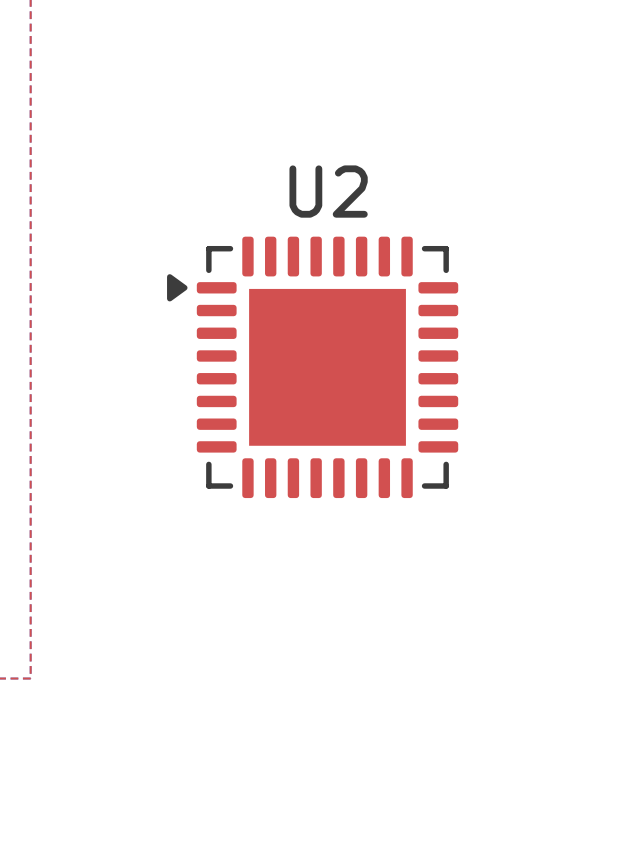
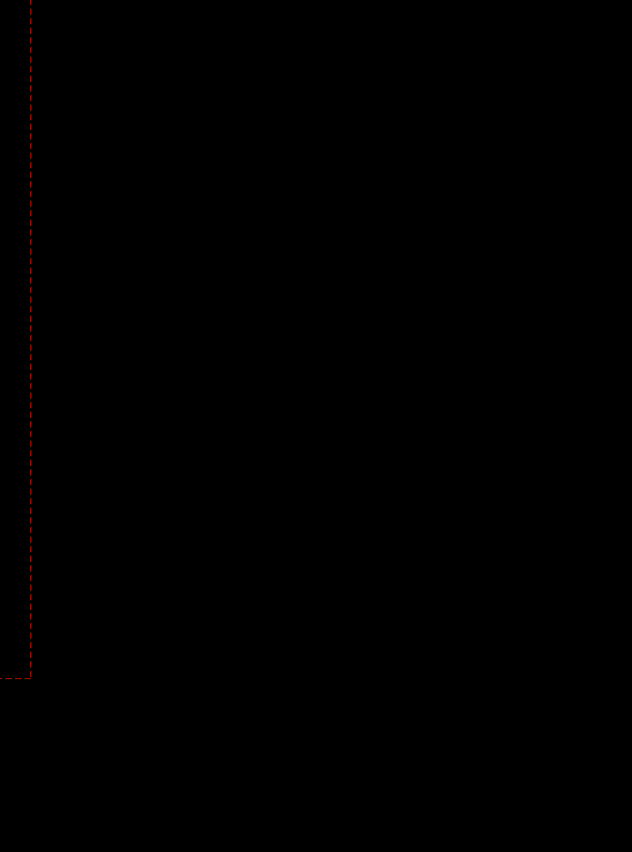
U2: (312, 367) -> none

